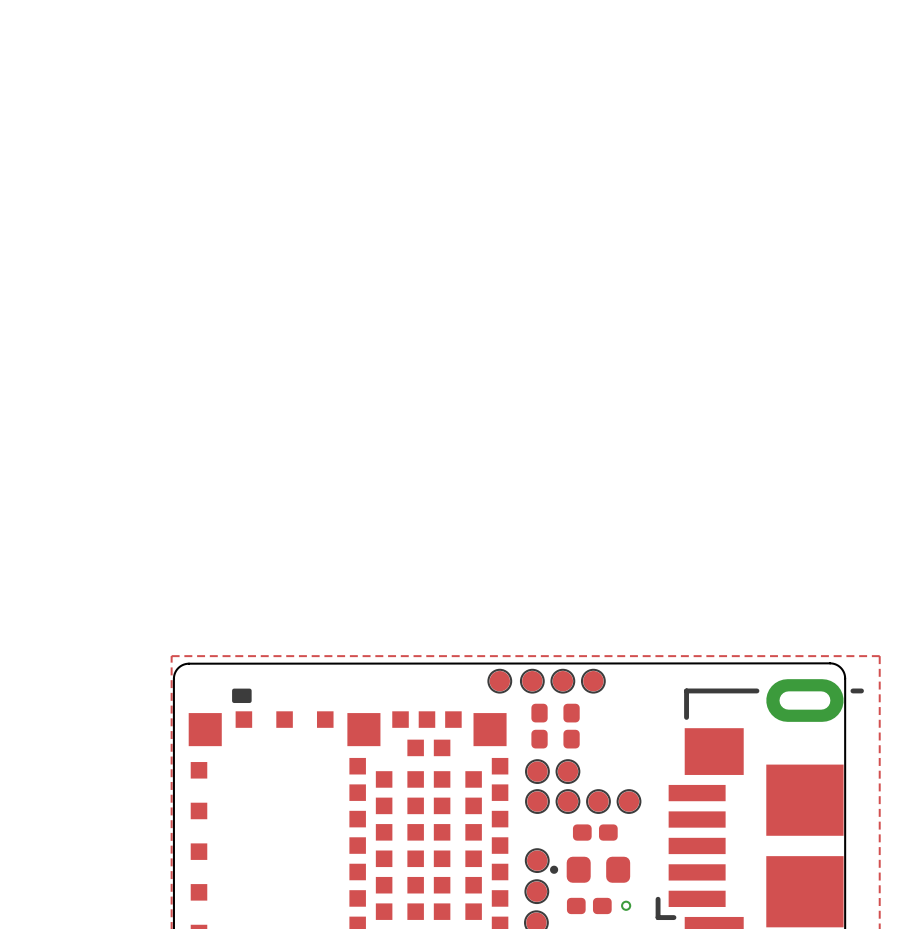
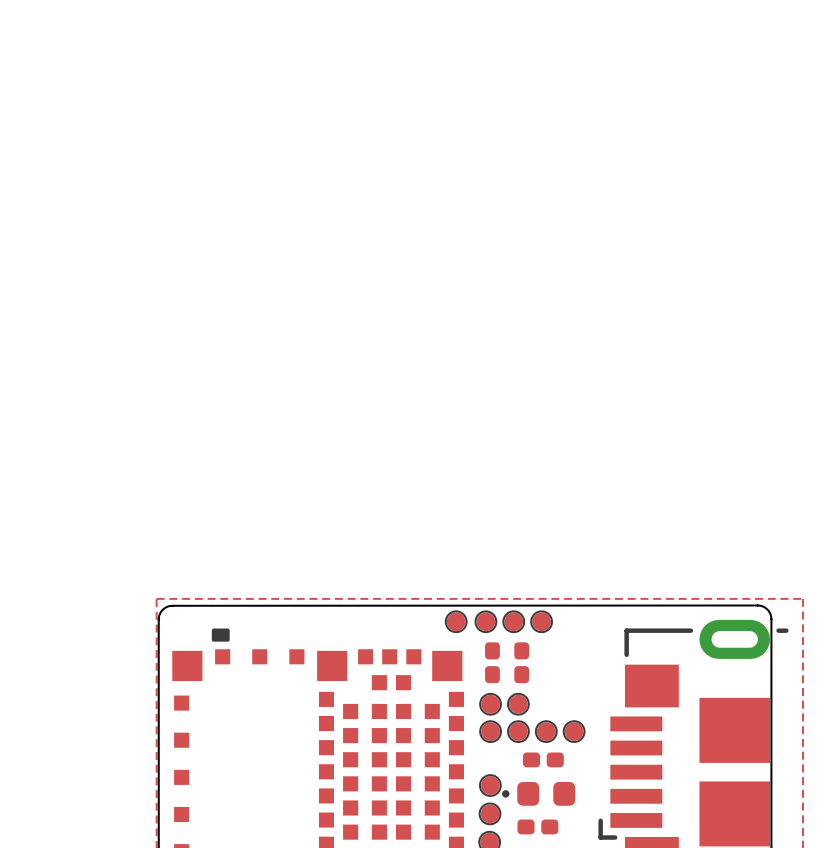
via: (626, 905) -> none

